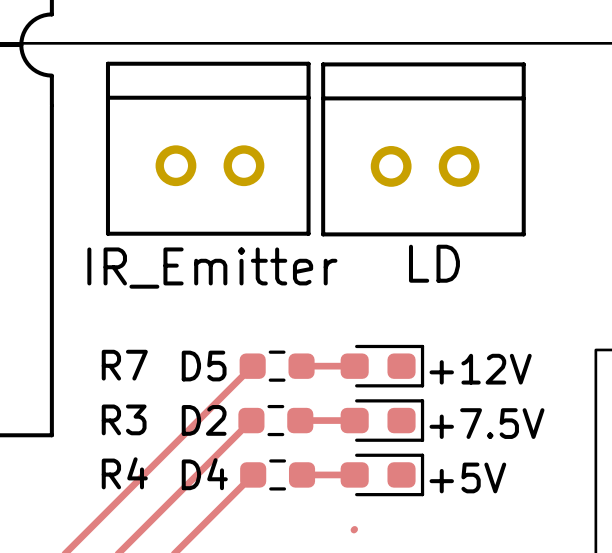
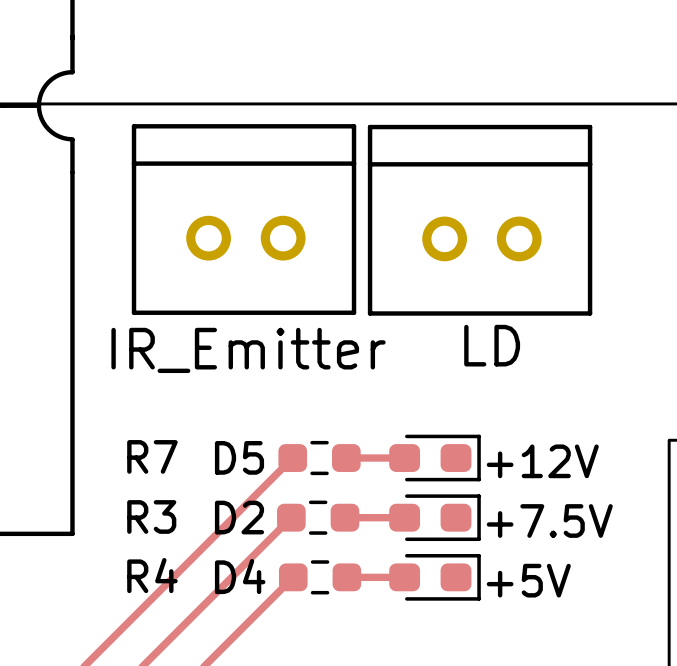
track: (354, 529) (353, 530) -> none

